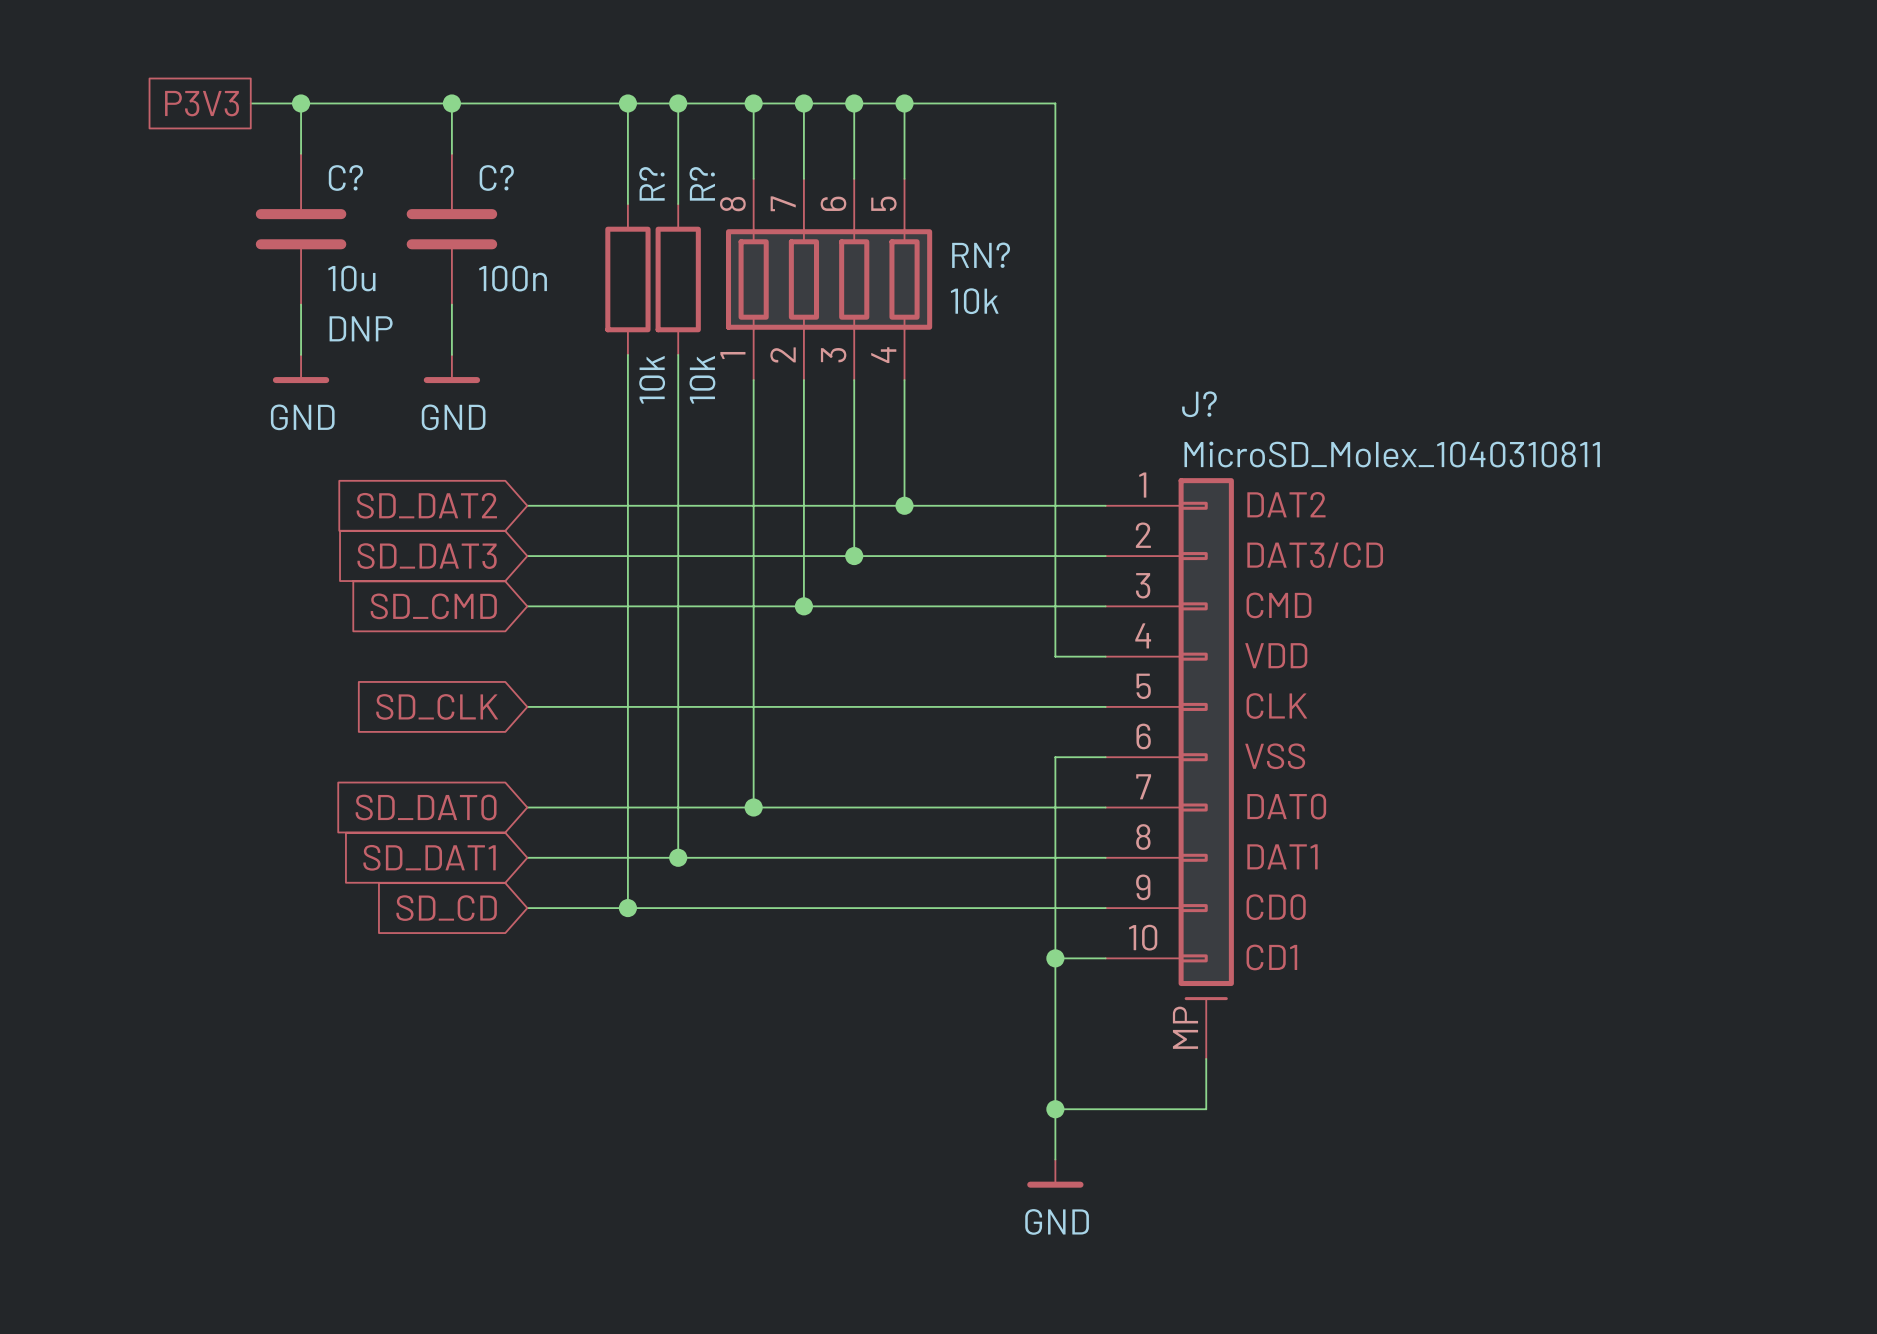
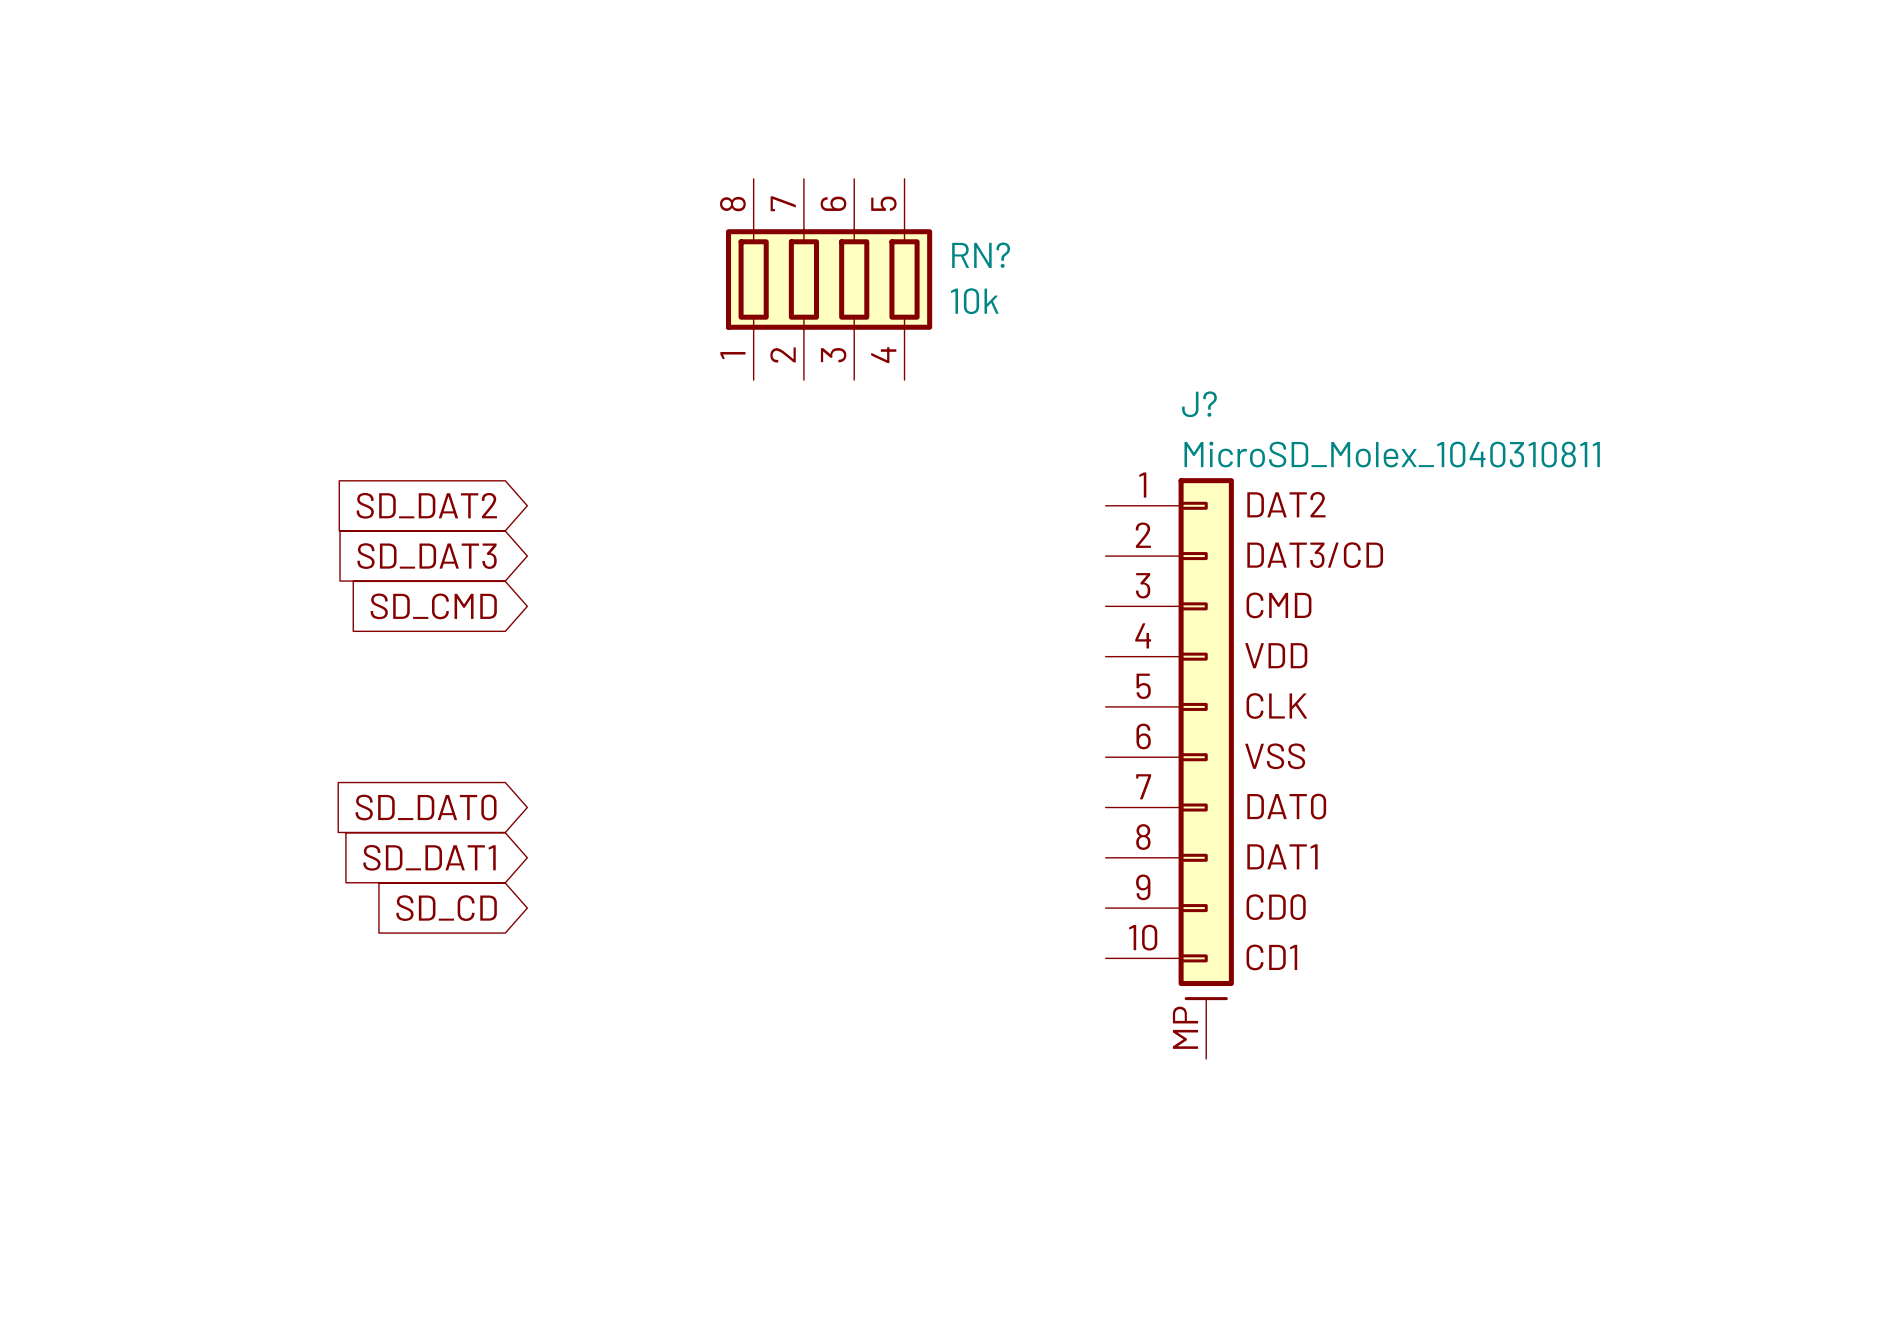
global label: P3V3 (202, 103) -> none
wire: (250, 103) (1055, 103) (1055, 656) (1105, 656) -> none
wire: (301, 103) (301, 153) -> none
junction: (301, 103) -> none
wire: (451, 103) (451, 153) -> none
junction: (451, 103) -> none
wire: (627, 103) (627, 204) -> none
junction: (627, 103) -> none
wire: (678, 103) (678, 204) -> none
junction: (678, 103) -> none
wire: (753, 103) (753, 178) -> none
junction: (753, 103) -> none
wire: (803, 103) (803, 178) -> none
junction: (803, 103) -> none
wire: (854, 103) (854, 178) -> none
junction: (854, 103) -> none
wire: (904, 103) (904, 178) -> none
junction: (904, 103) -> none
C?: 10u (301, 229) -> none
C?: 100n (451, 229) -> none
R?: 10k (627, 279) -> none
R?: 10k (678, 279) -> none
wire: (301, 304) (301, 354) -> none
wire: (451, 304) (451, 354) -> none
wire: (627, 354) (627, 908) -> none
wire: (678, 354) (678, 857) -> none
power symbol: GND (301, 369) -> none
power symbol: GND (451, 369) -> none
wire: (753, 380) (753, 807) -> none
wire: (803, 380) (803, 606) -> none
wire: (854, 380) (854, 556) -> none
wire: (904, 380) (904, 505) -> none
wire: (527, 505) (1105, 505) -> none
junction: (904, 505) -> none
wire: (527, 556) (1105, 556) -> none
junction: (854, 556) -> none
wire: (527, 606) (1105, 606) -> none
junction: (803, 606) -> none
global label: SD_CLK (437, 706) -> none
wire: (527, 706) (1105, 706) -> none
wire: (1105, 757) (1055, 757) (1055, 1159) -> none
wire: (527, 807) (1105, 807) -> none
junction: (753, 807) -> none
wire: (527, 857) (1105, 857) -> none
junction: (678, 857) -> none
wire: (527, 908) (1105, 908) -> none
junction: (627, 908) -> none
wire: (1055, 958) (1105, 958) -> none
junction: (1055, 958) -> none
wire: (1206, 1058) (1206, 1109) (1055, 1109) -> none
junction: (1055, 1109) -> none
power symbol: GND (1055, 1173) -> none

